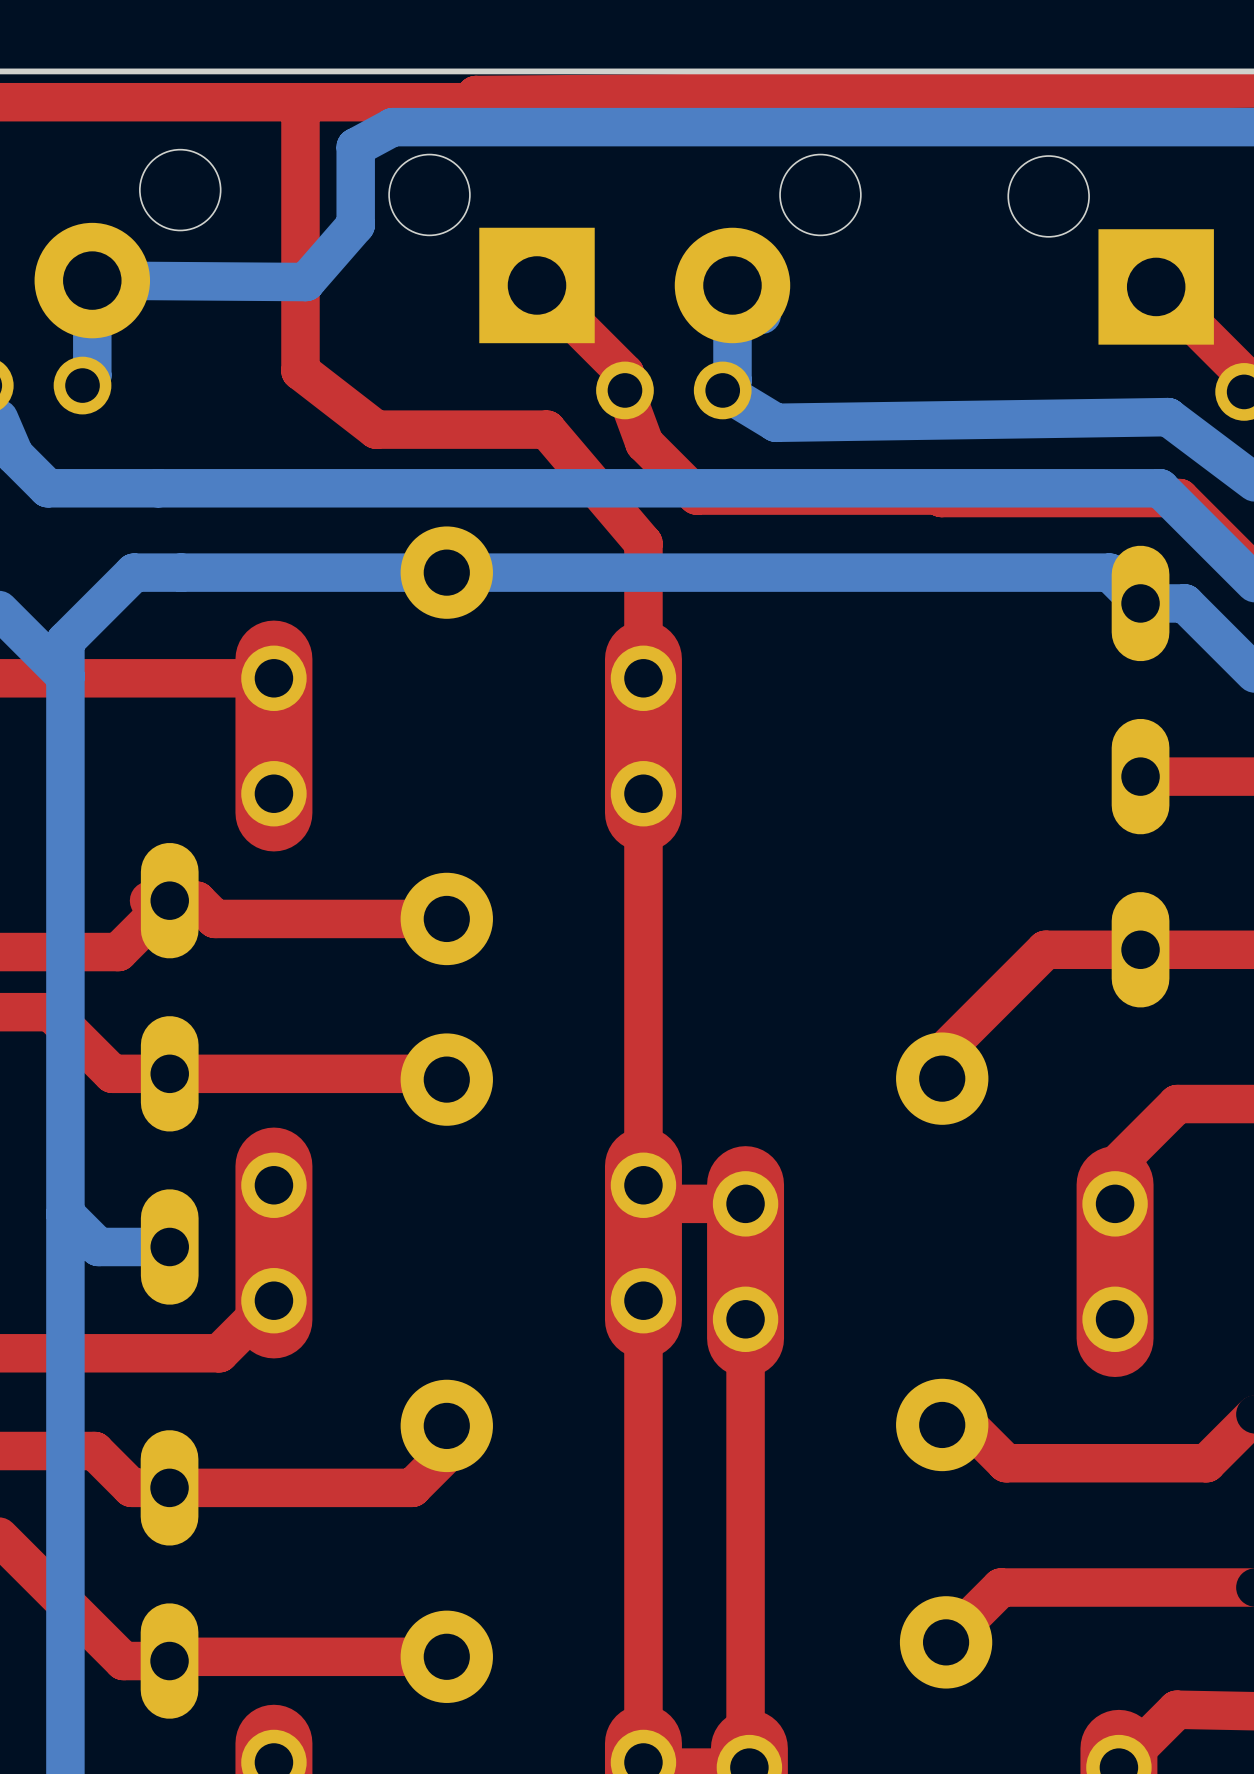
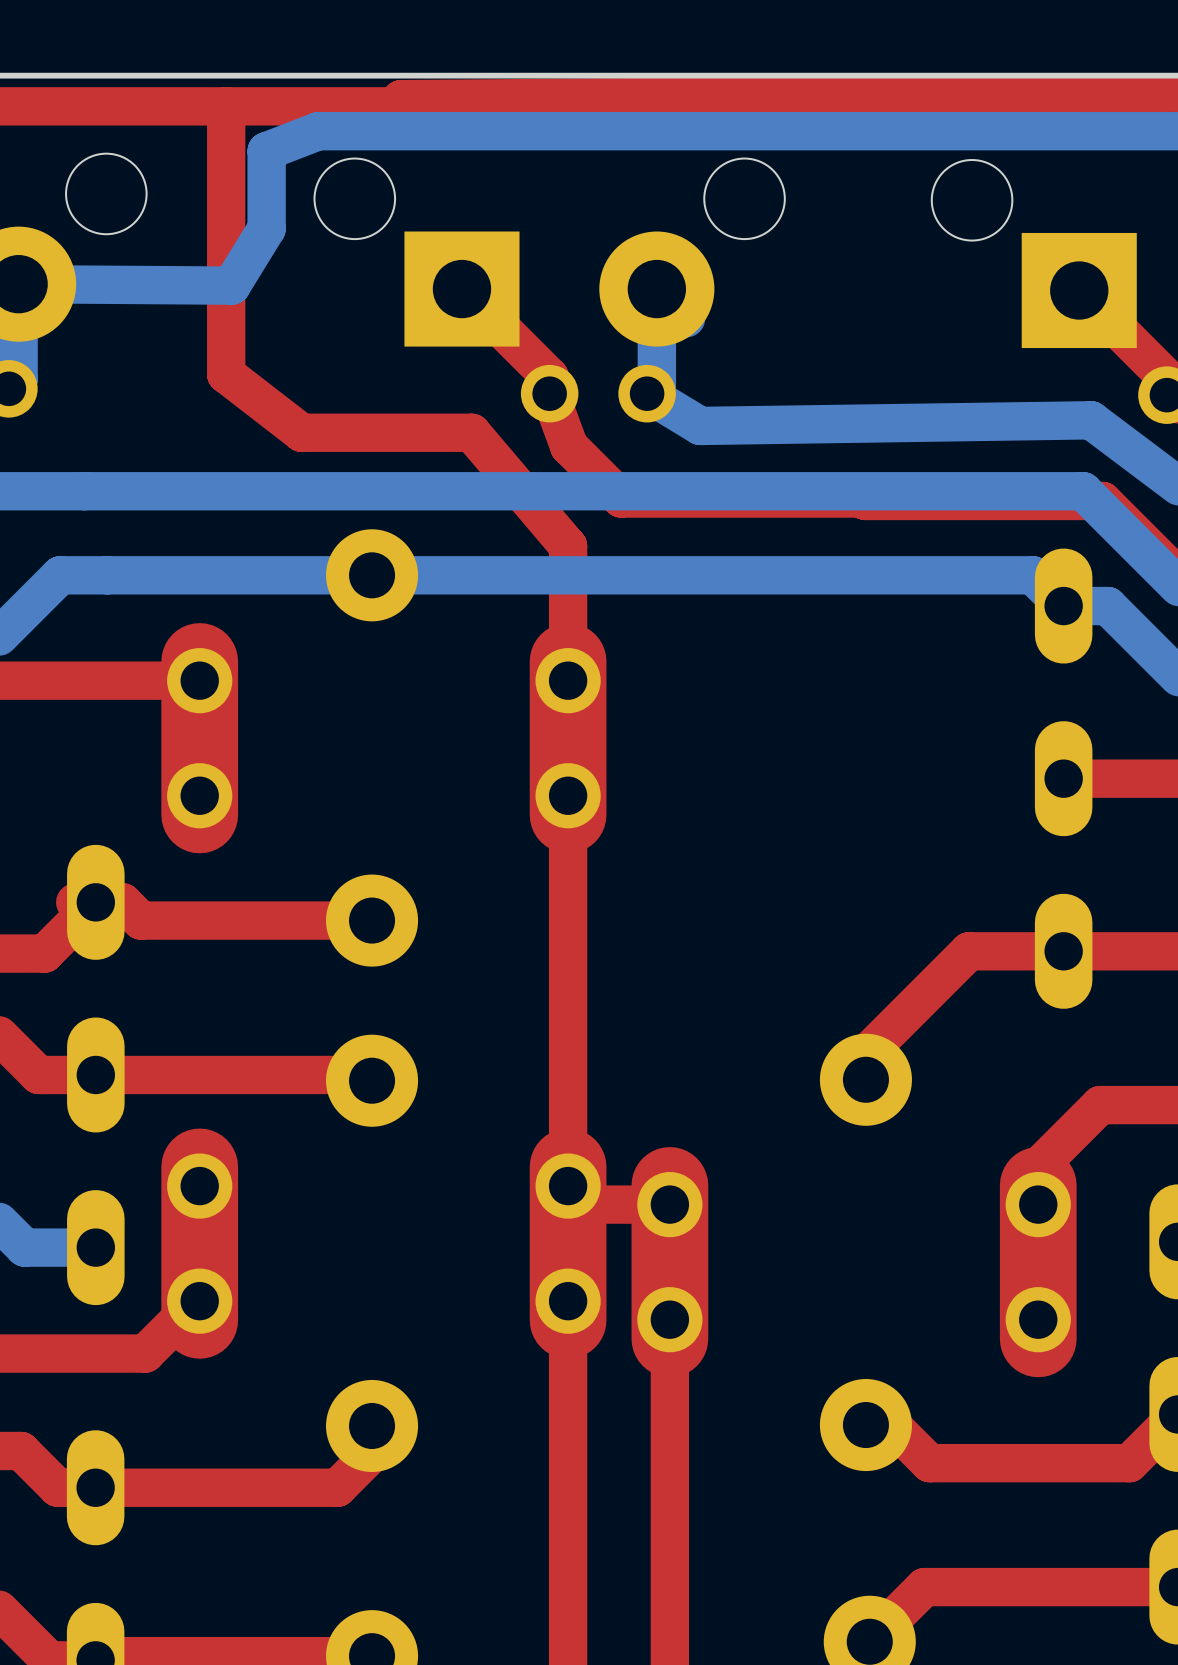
bottom track: (392, 127) (355, 147) (355, 224) (305, 282) -> (318, 131) (266, 151) (266, 228) (231, 285)

